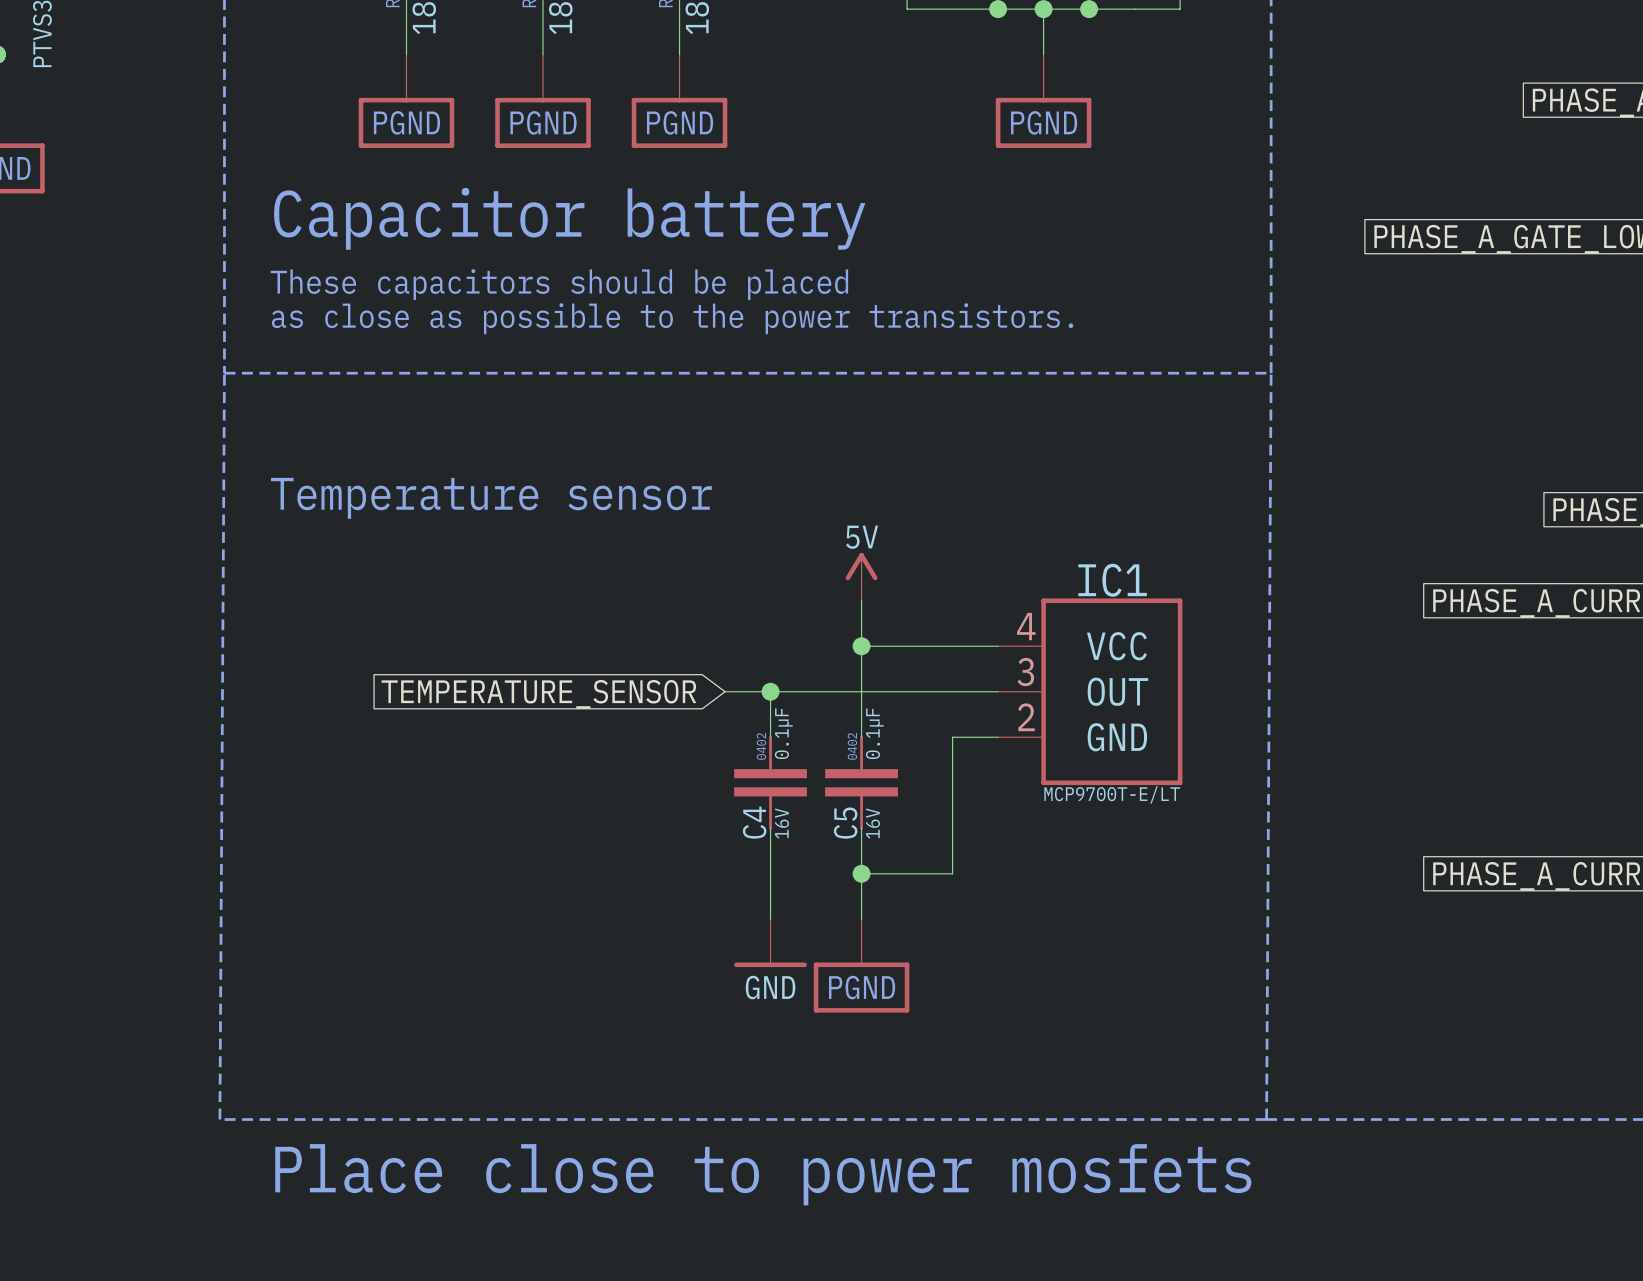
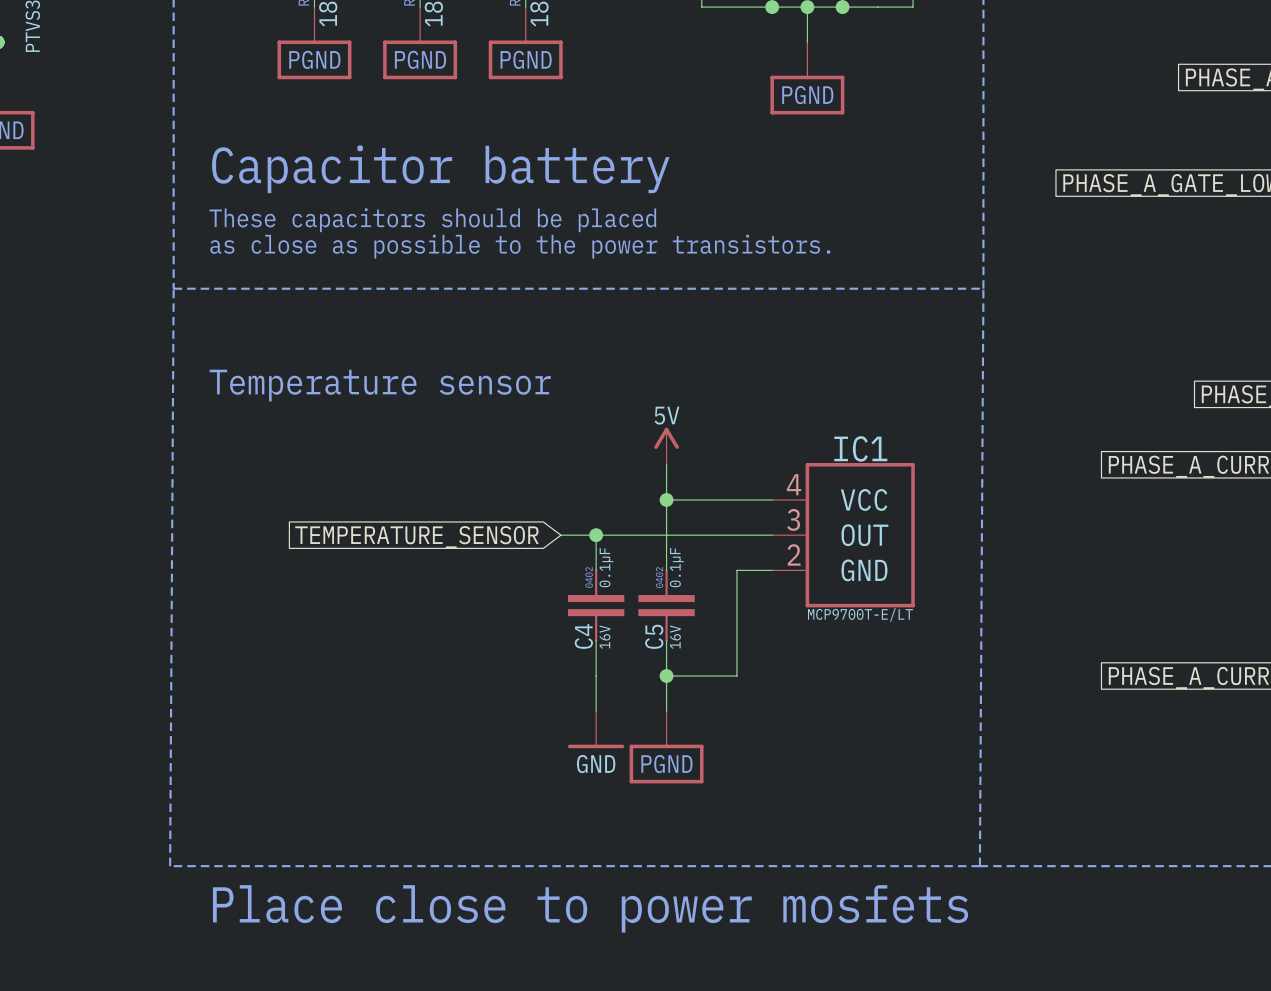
power symbol position: PGND (406, 101) -> PGND (314, 43)
power symbol position: PGND (543, 101) -> PGND (420, 43)
power symbol position: PGND (679, 101) -> PGND (525, 43)

